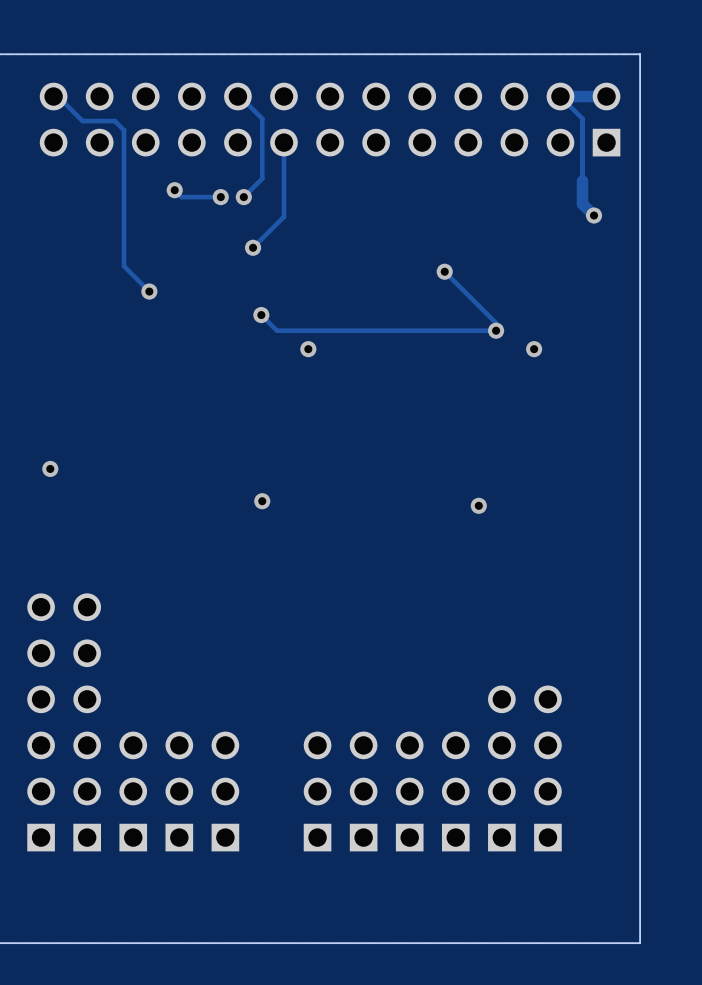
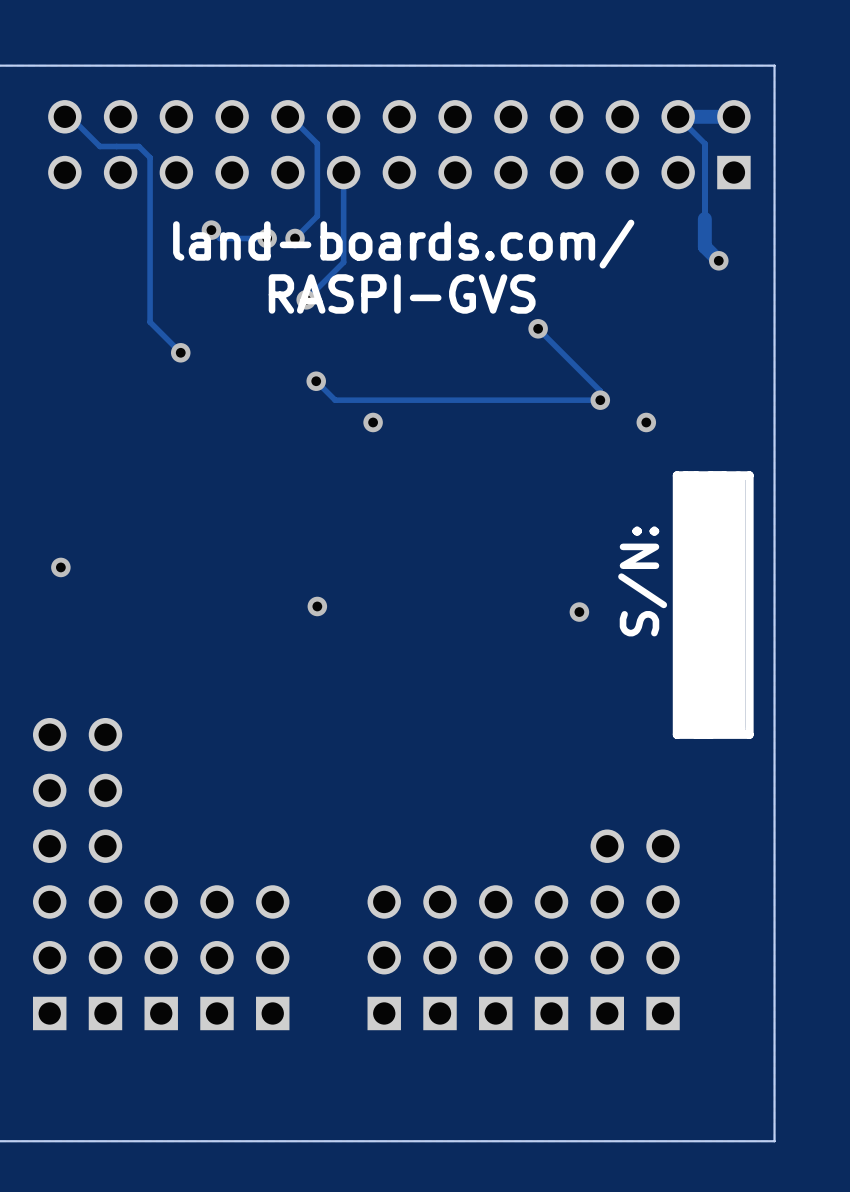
text: none -> land-boards.com/ (403, 244)
text: none -> RASPI-GVS (402, 293)
drawing: none -> [672, 471, 754, 739]
text: none -> S/N: (642, 581)

